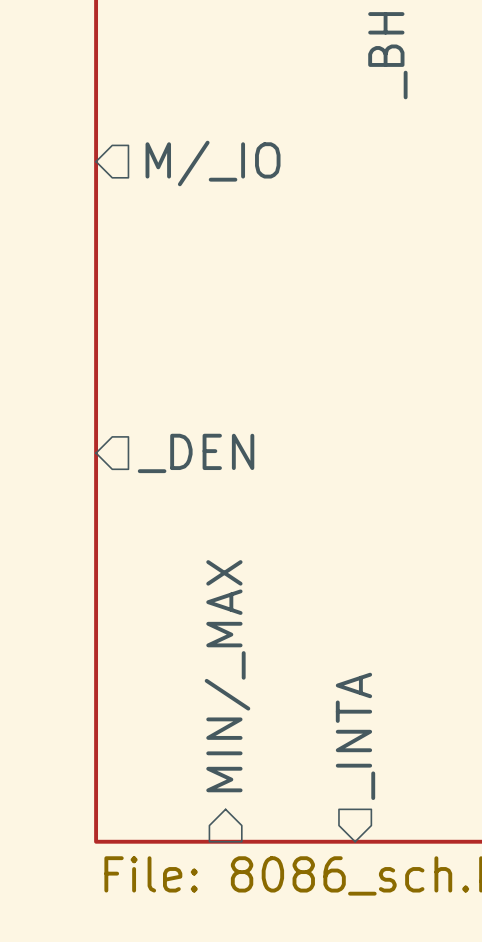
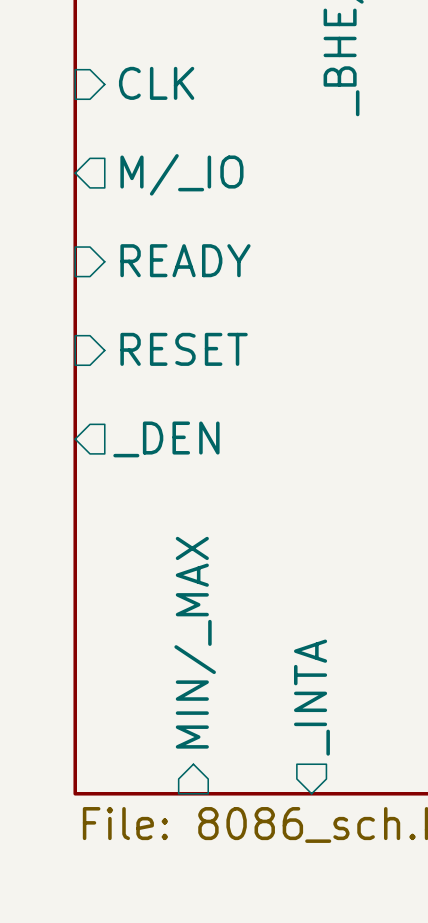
sheet pin: none -> CLK (156, 83)
sheet pin: none -> READY (185, 260)
sheet pin: none -> RESET (184, 349)

